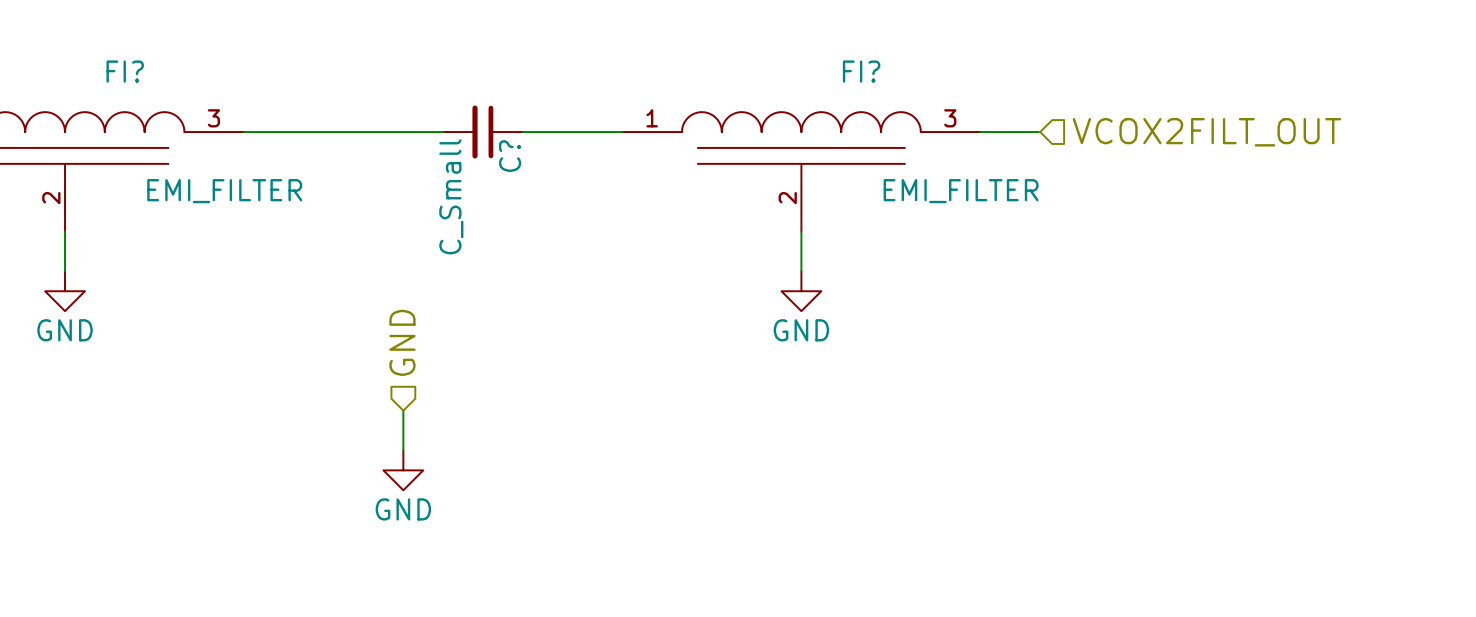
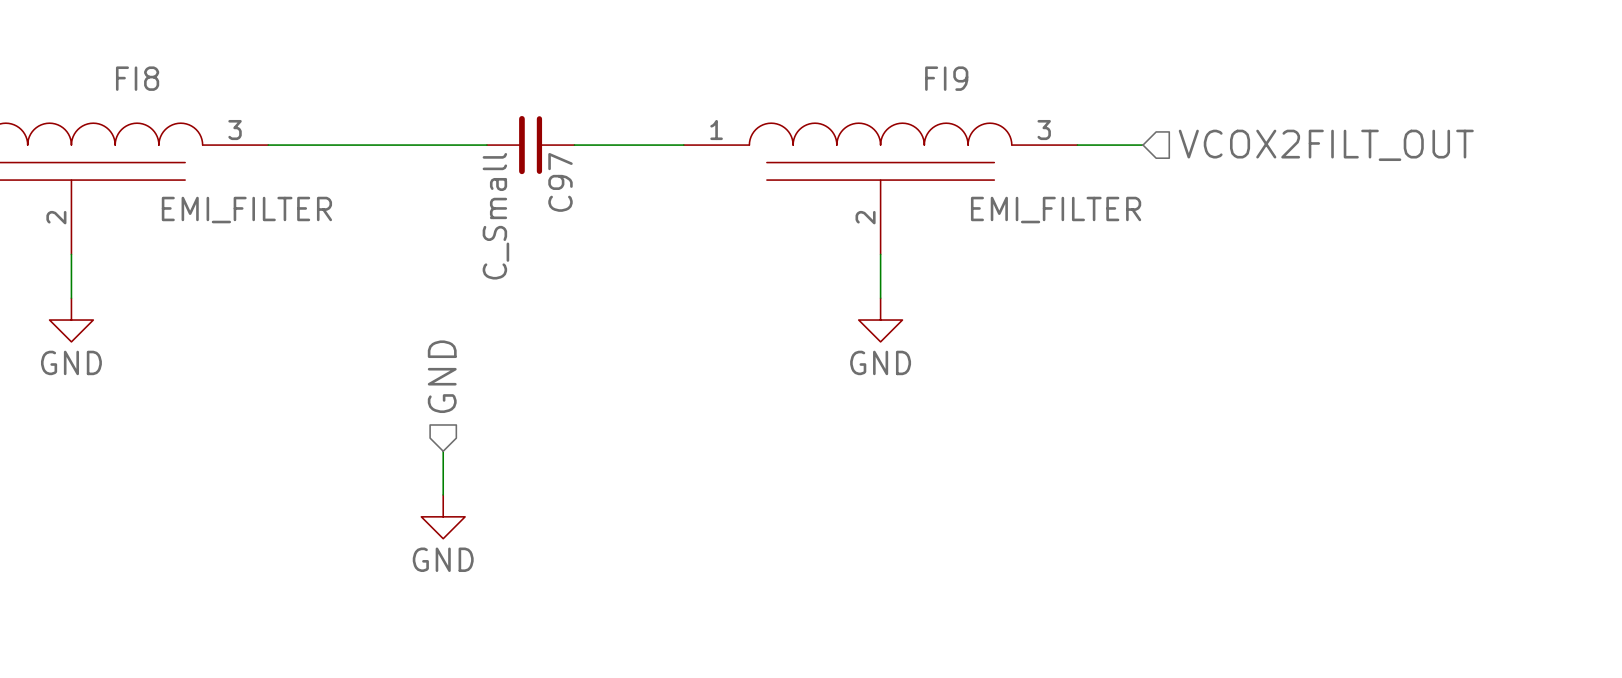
FI? name: FI? (125, 71) -> FI8 (137, 78)
FI? name: FI? (861, 71) -> FI9 (946, 78)
C? name: C? (510, 156) -> C97 (560, 182)

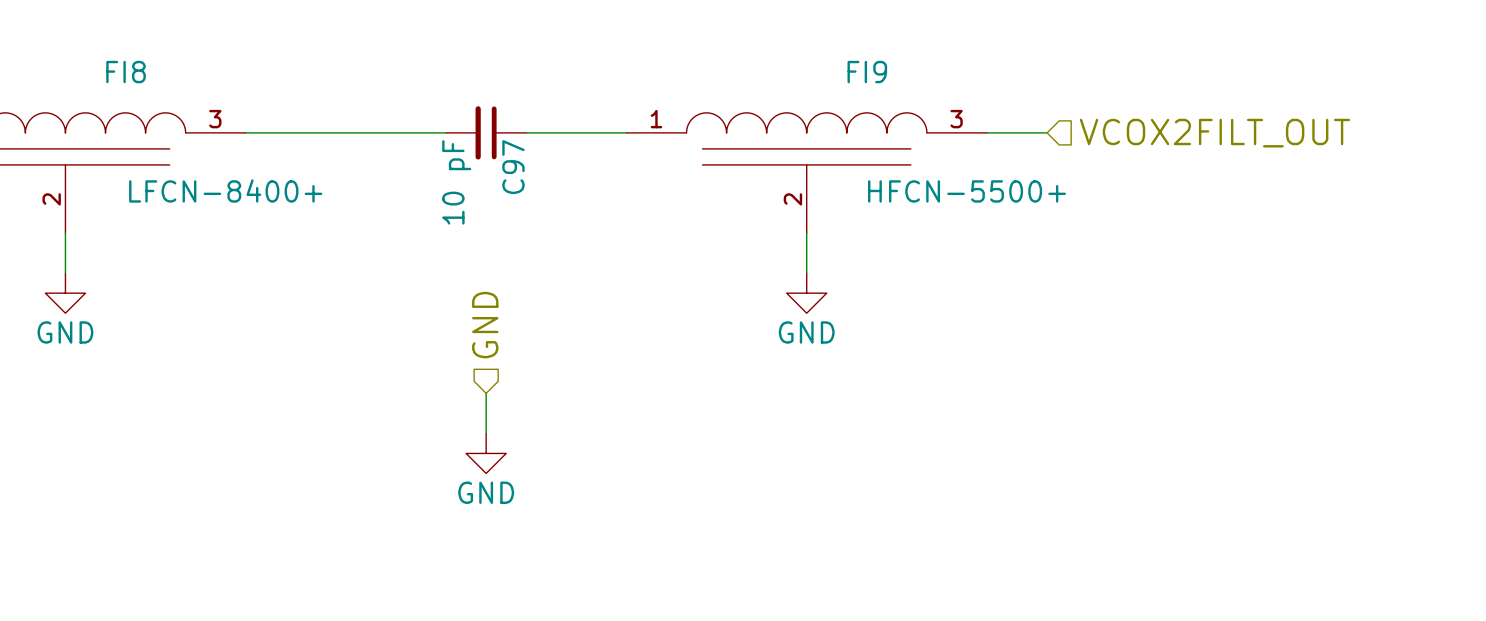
FI8 value: EMI_FILTER (246, 210) -> LFCN-8400+ (225, 190)
FI9 value: EMI_FILTER (1056, 210) -> HFCN-5500+ (966, 191)
C97 value: C_Small (495, 216) -> 10 pF (456, 182)
hierarchical label position: GND (442, 376) -> GND (485, 325)
wire: (443, 451) (443, 494) -> (486, 393) (486, 433)
power symbol position: GND (443, 516) -> GND (486, 453)

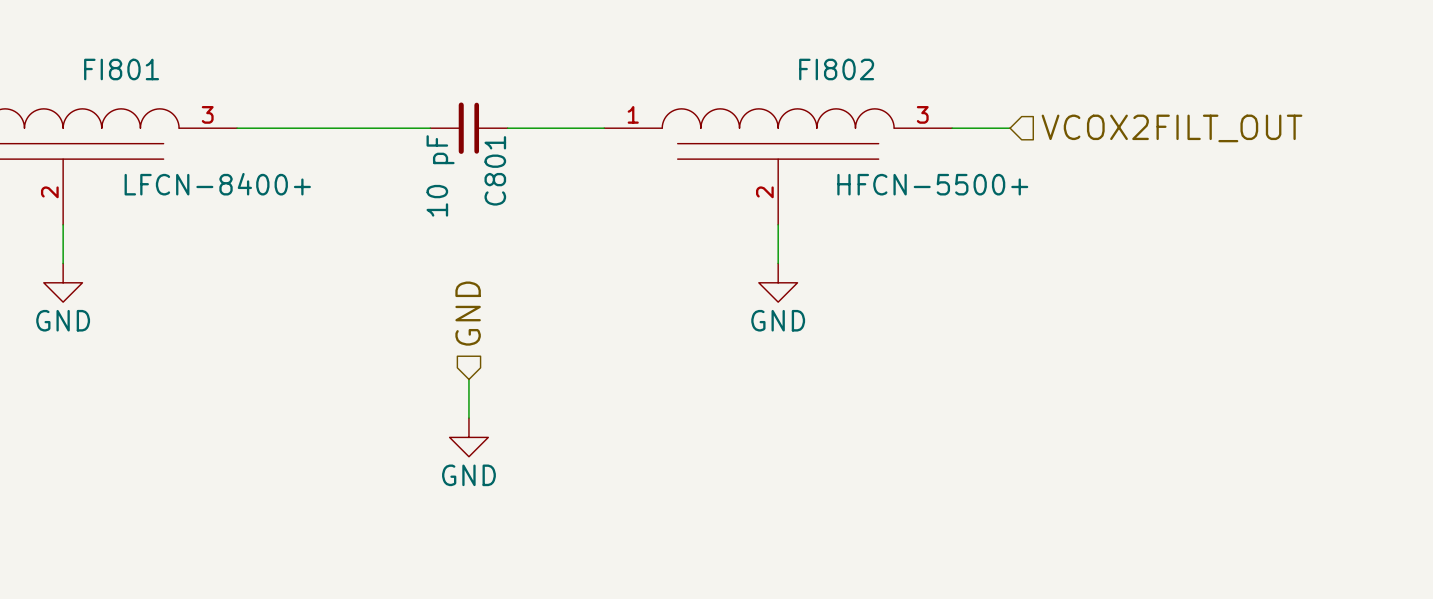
FI8 name: FI8 (126, 72) -> FI801 (121, 69)
FI9 name: FI9 (867, 72) -> FI802 (836, 69)
C97 name: C97 (513, 167) -> C801 (495, 170)

